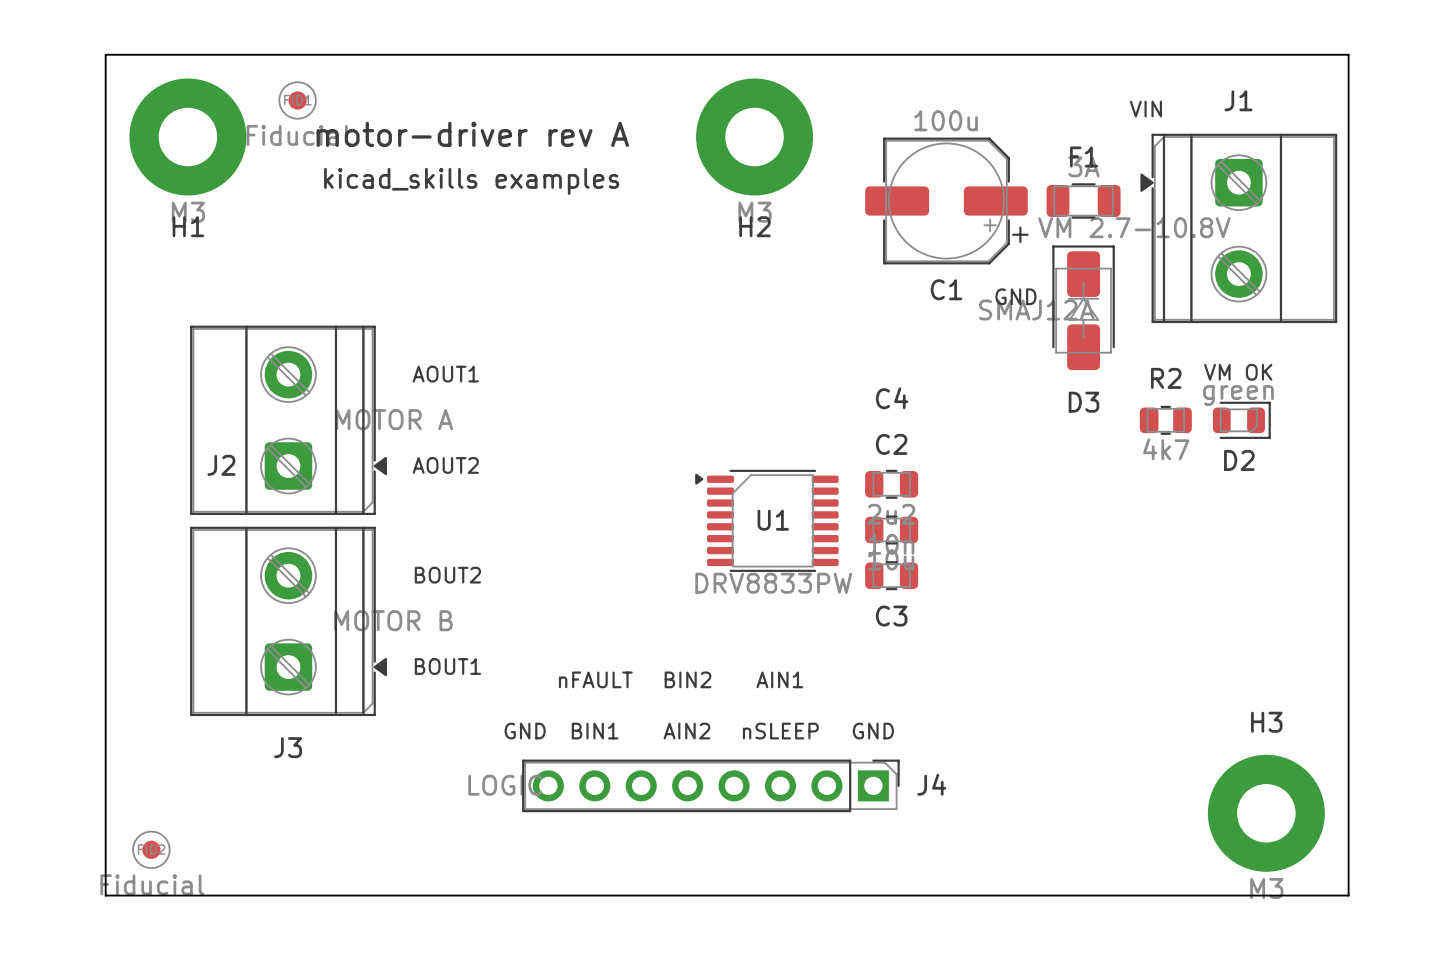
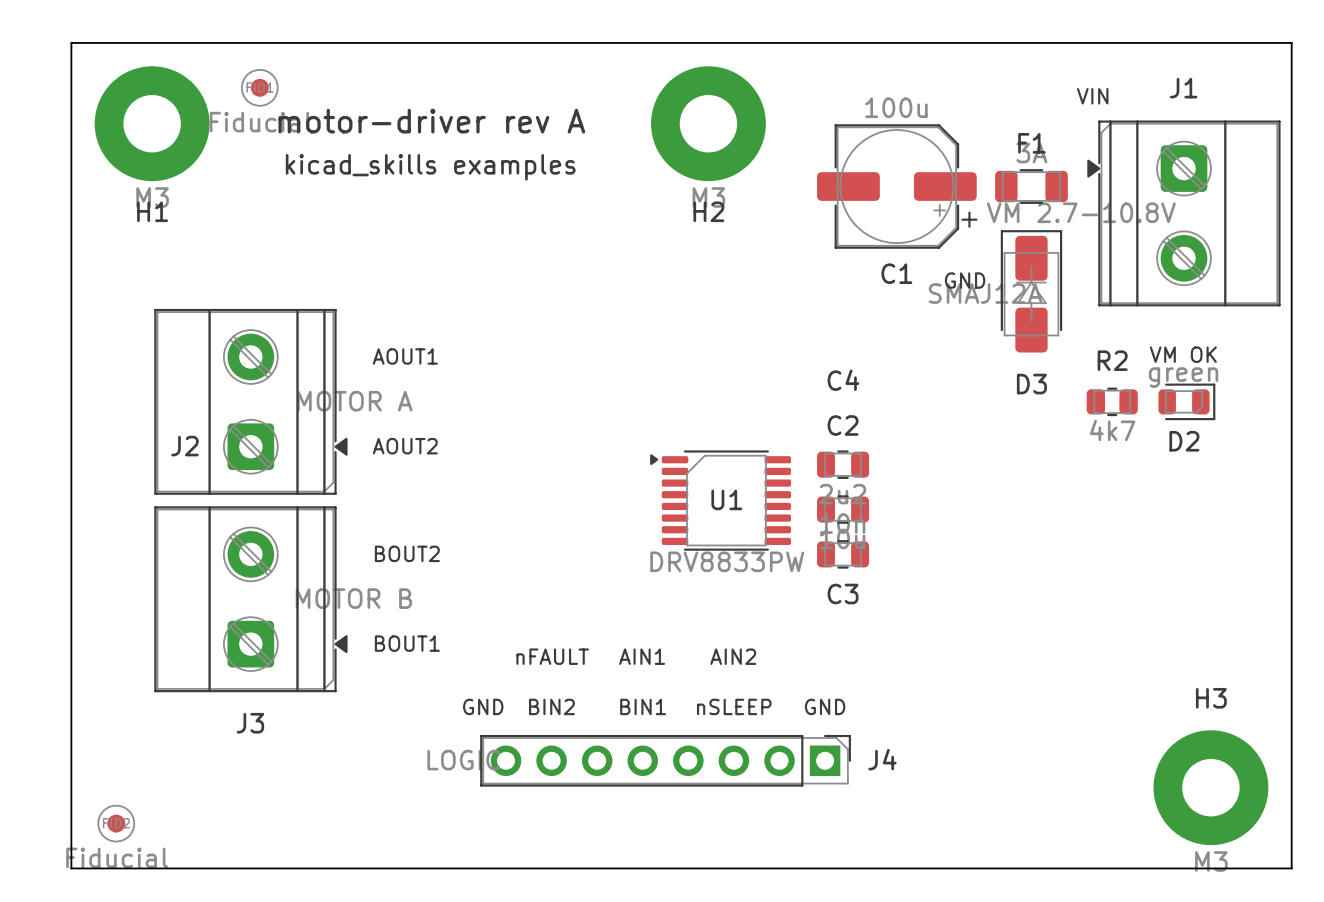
text: BIN2 (688, 679) -> AIN1 (642, 656)
text: AIN1 (779, 679) -> AIN2 (733, 656)
text: BIN1 (595, 731) -> BIN2 (551, 706)
text: AIN2 (686, 731) -> BIN1 (643, 706)

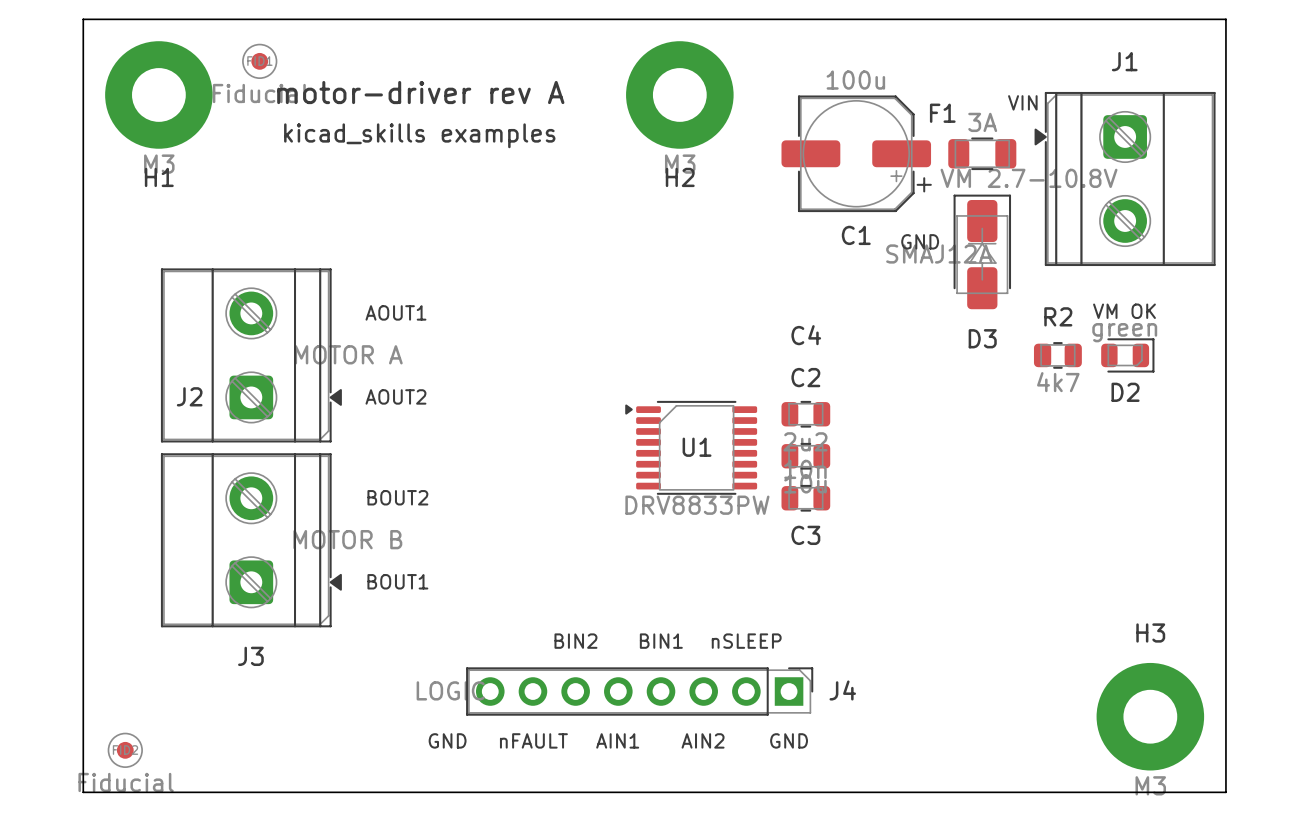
text position: VIN (1092, 96) -> VIN (1022, 102)
F1 name position: F1 (1031, 143) -> F1 (942, 113)
text position: nFAULT (552, 656) -> nFAULT (533, 740)
text position: AIN1 (642, 656) -> AIN1 (617, 740)
text position: AIN2 (733, 656) -> AIN2 (703, 740)
text position: GND (483, 706) -> GND (447, 740)
text position: BIN2 (551, 706) -> BIN2 (575, 641)
text position: BIN1 (643, 706) -> BIN1 (661, 641)
text position: nSLEEP (734, 706) -> nSLEEP (746, 641)
text position: GND (825, 706) -> GND (789, 740)

